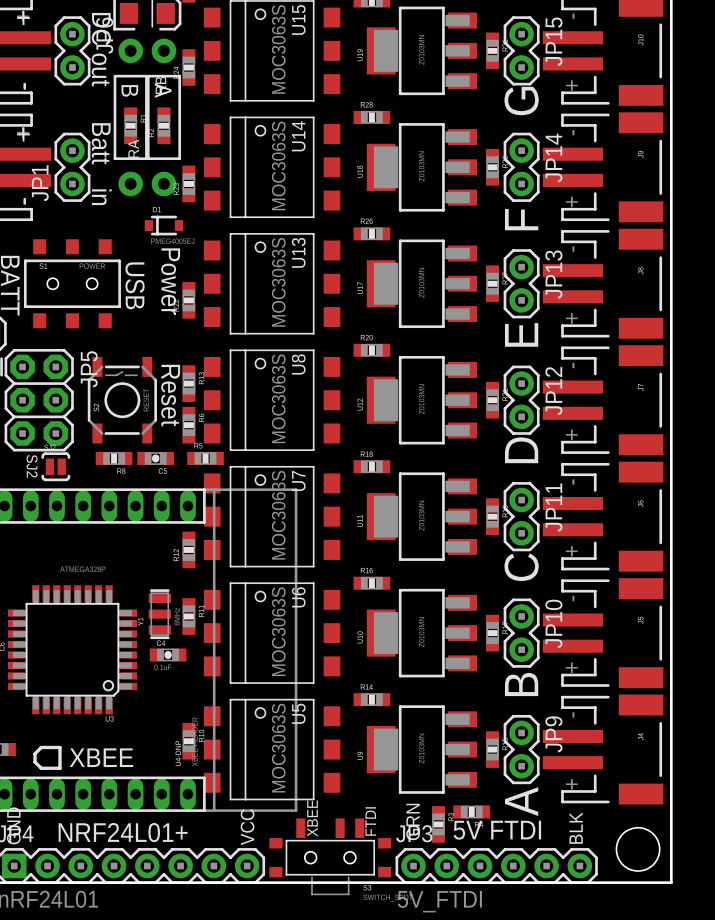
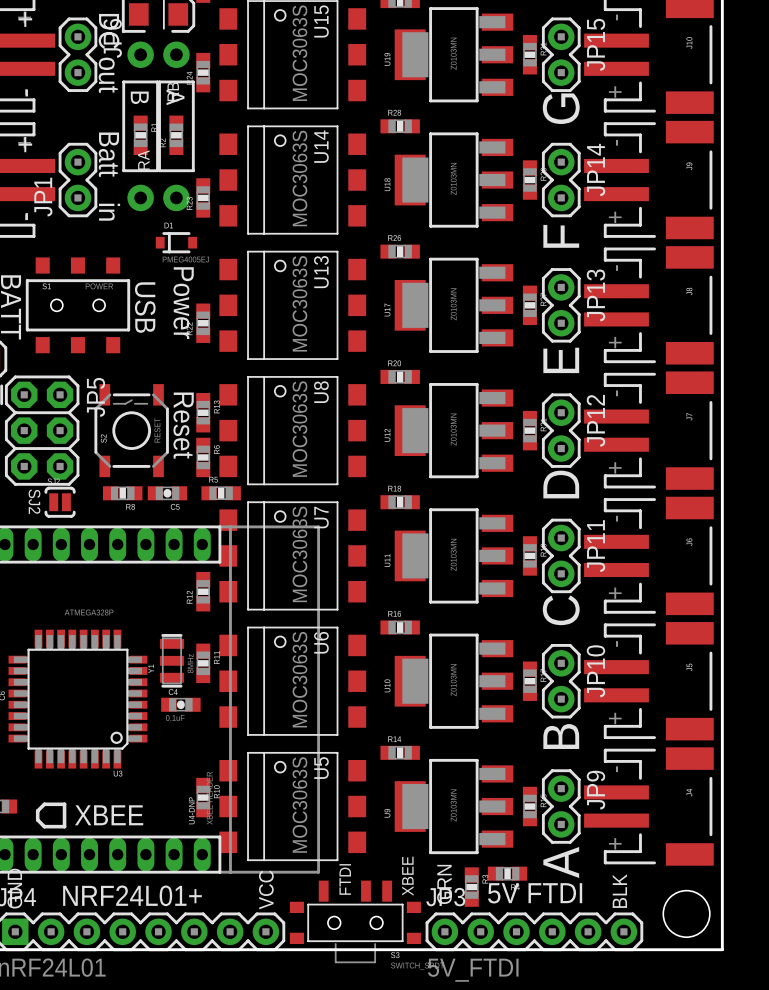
text: XBEE (312, 818) -> FTDI (345, 879)
text: FTDI (370, 821) -> XBEE (407, 876)

